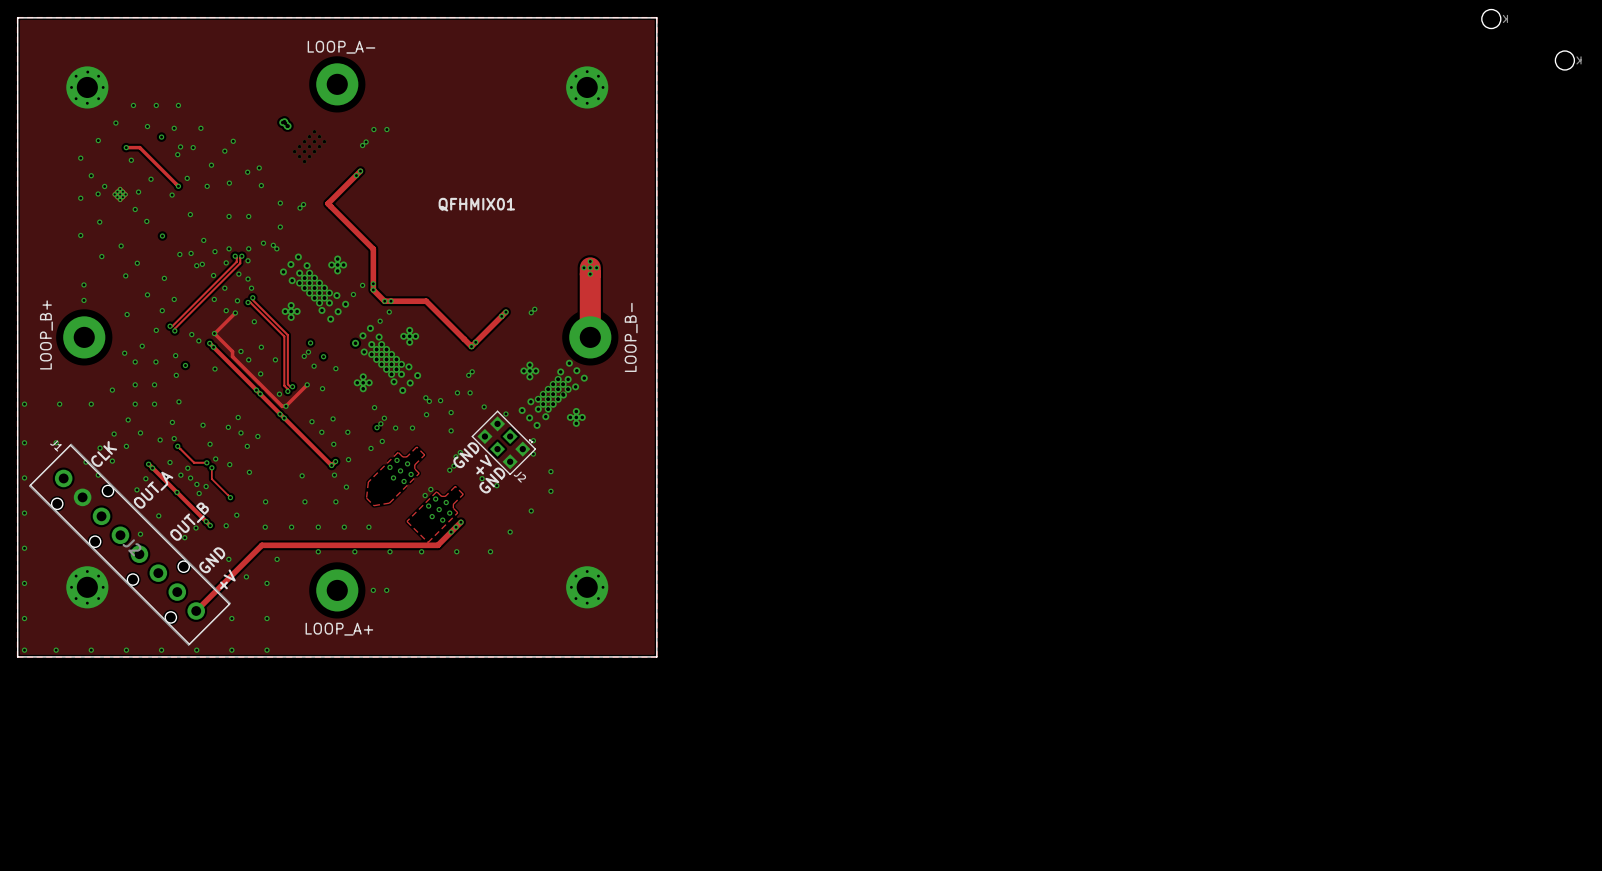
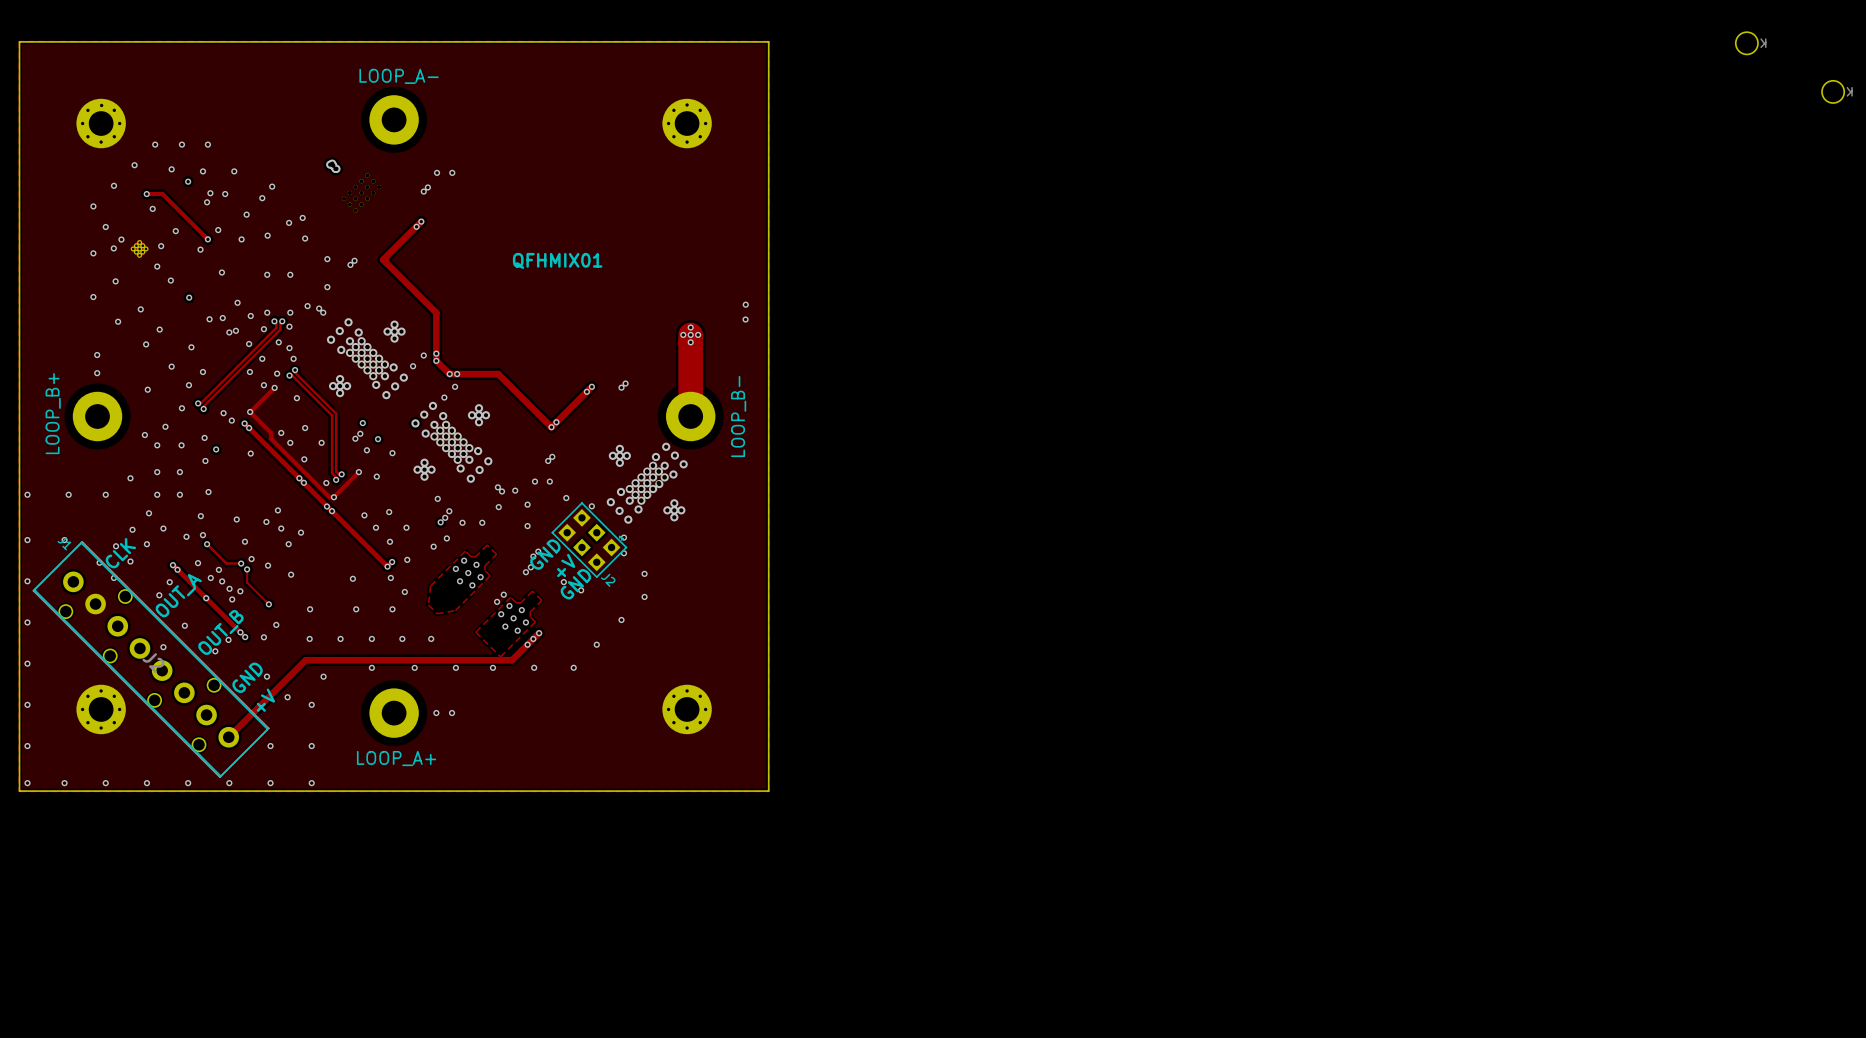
via: none -> (745, 304)
via: none -> (745, 319)

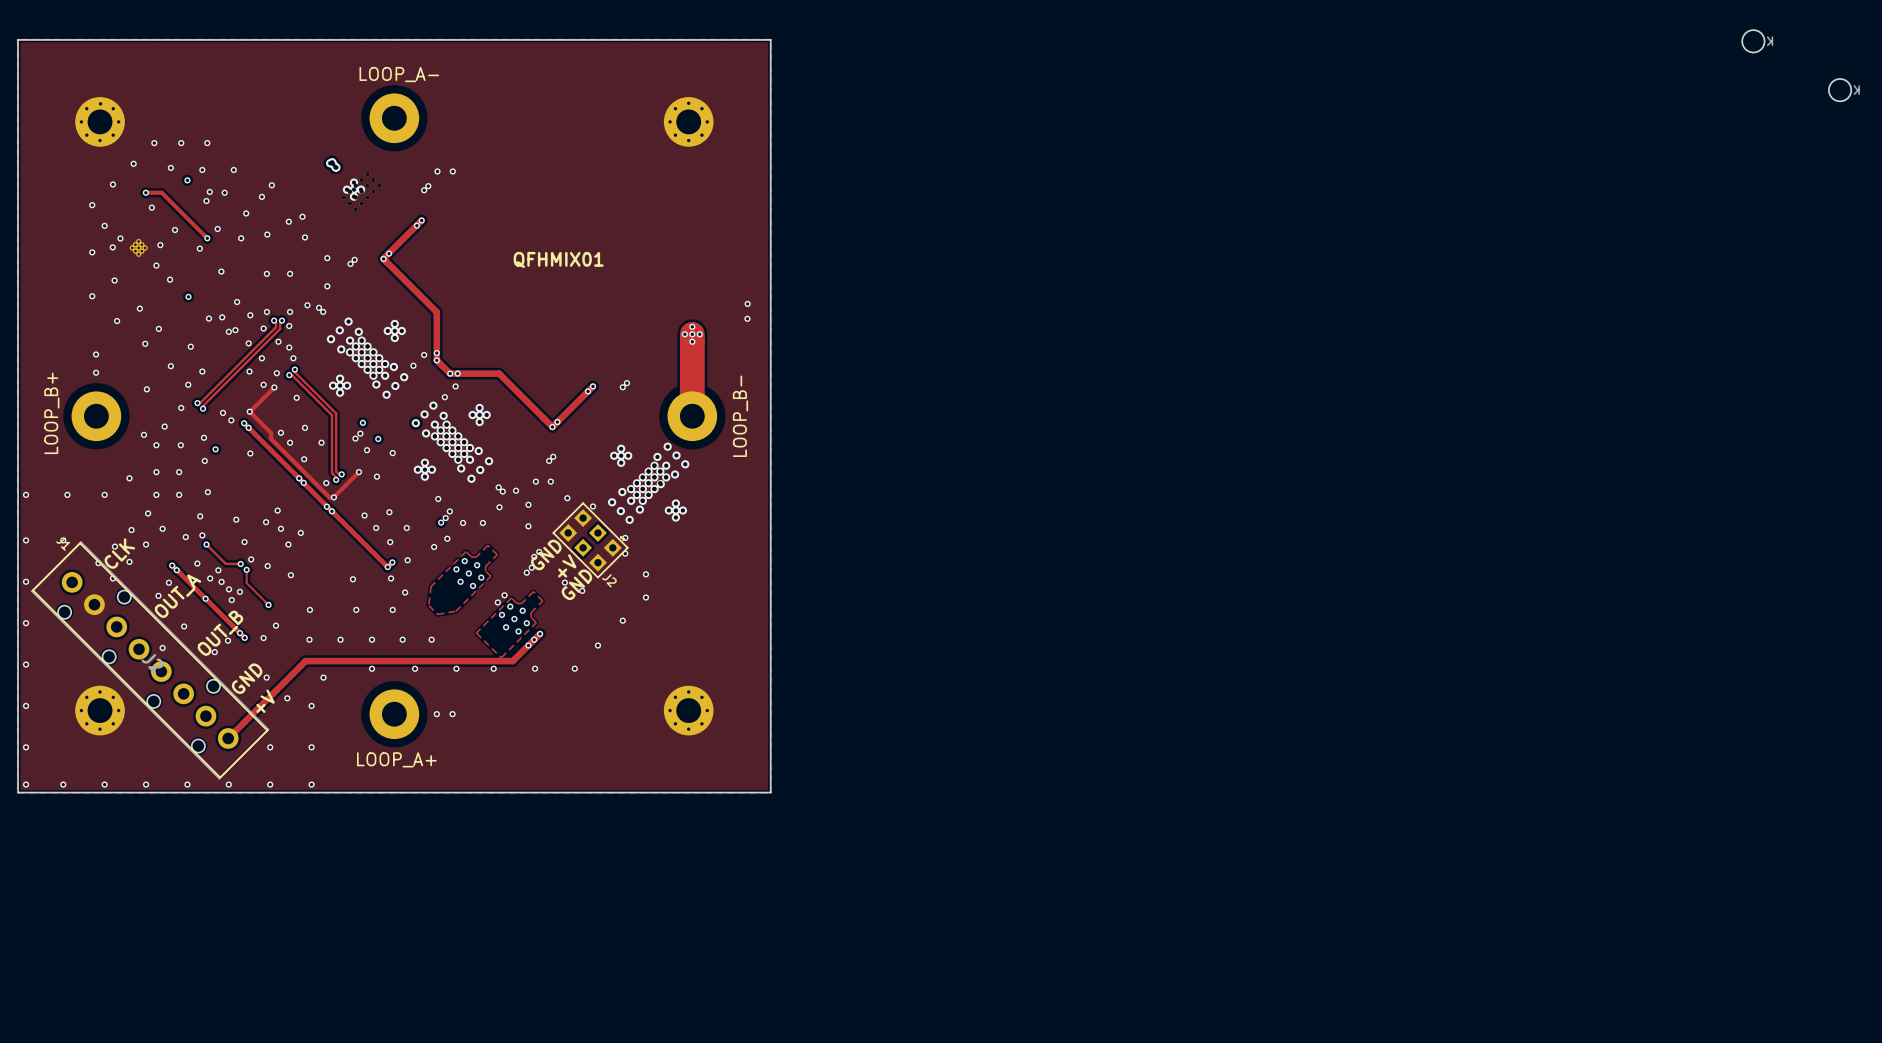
via: none -> (354, 182)
via: none -> (346, 189)
via: none -> (354, 189)
via: none -> (361, 189)
via: none -> (354, 196)
via: none -> (388, 253)
via: none -> (383, 258)

